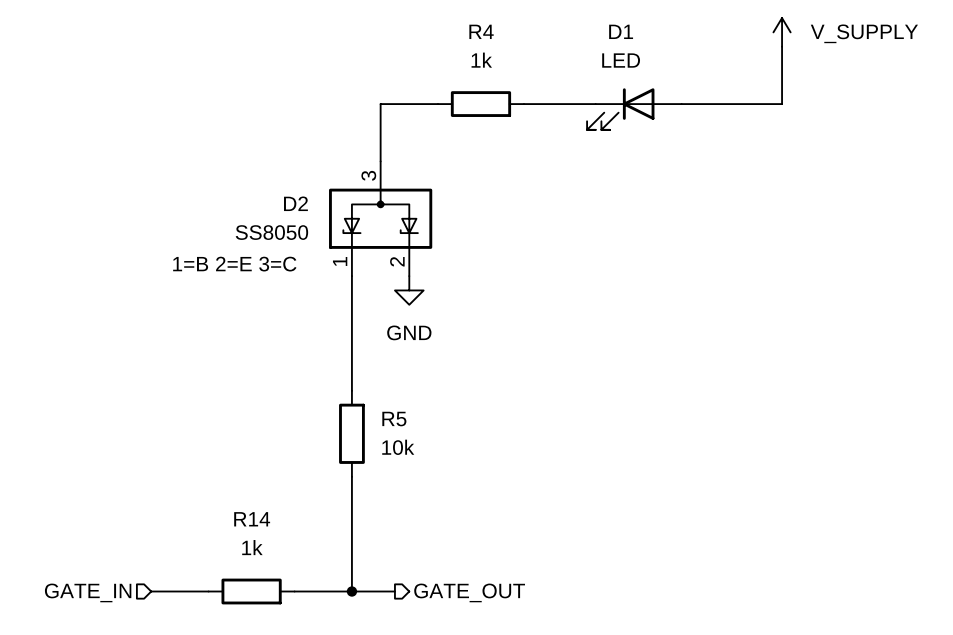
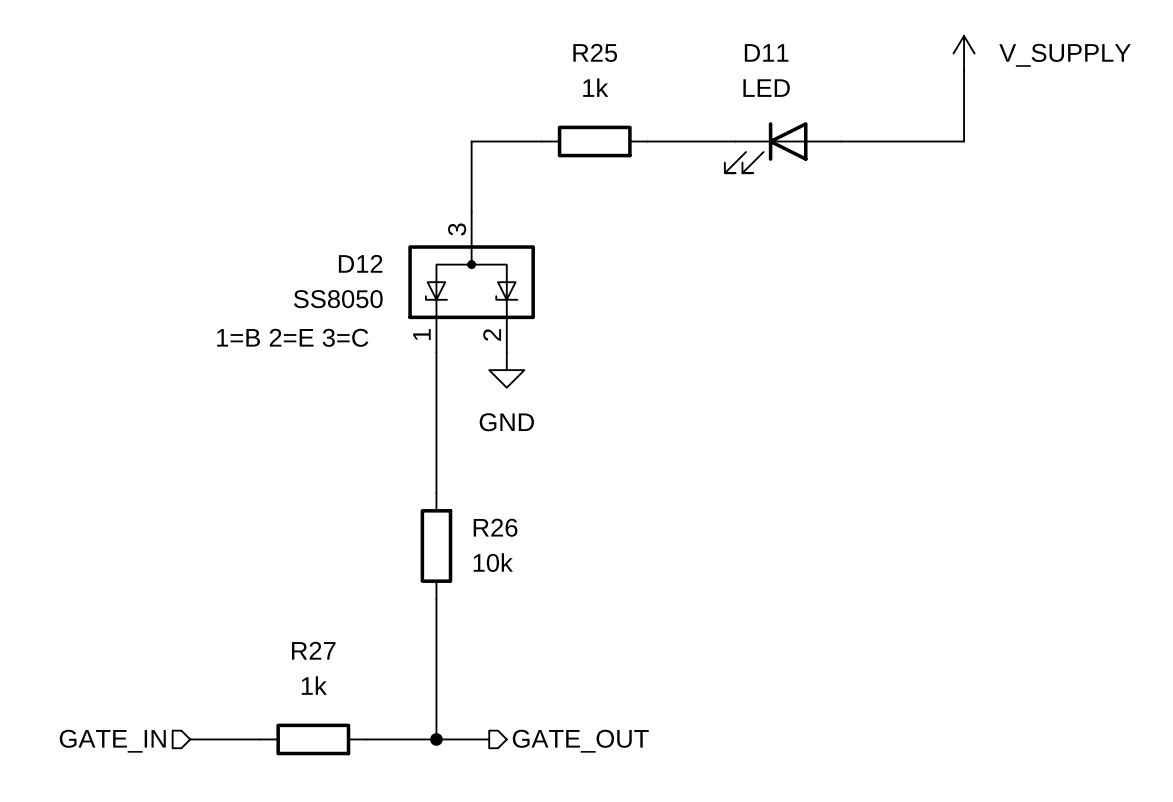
R4 name: R4 (481, 31) -> R25 (595, 52)
D1 name: D1 (621, 31) -> D11 (766, 52)
D2 name: D2 (295, 203) -> D12 (360, 263)
R5 name: R5 (394, 419) -> R26 (495, 527)
R14 name: R14 (252, 519) -> R27 (313, 650)

